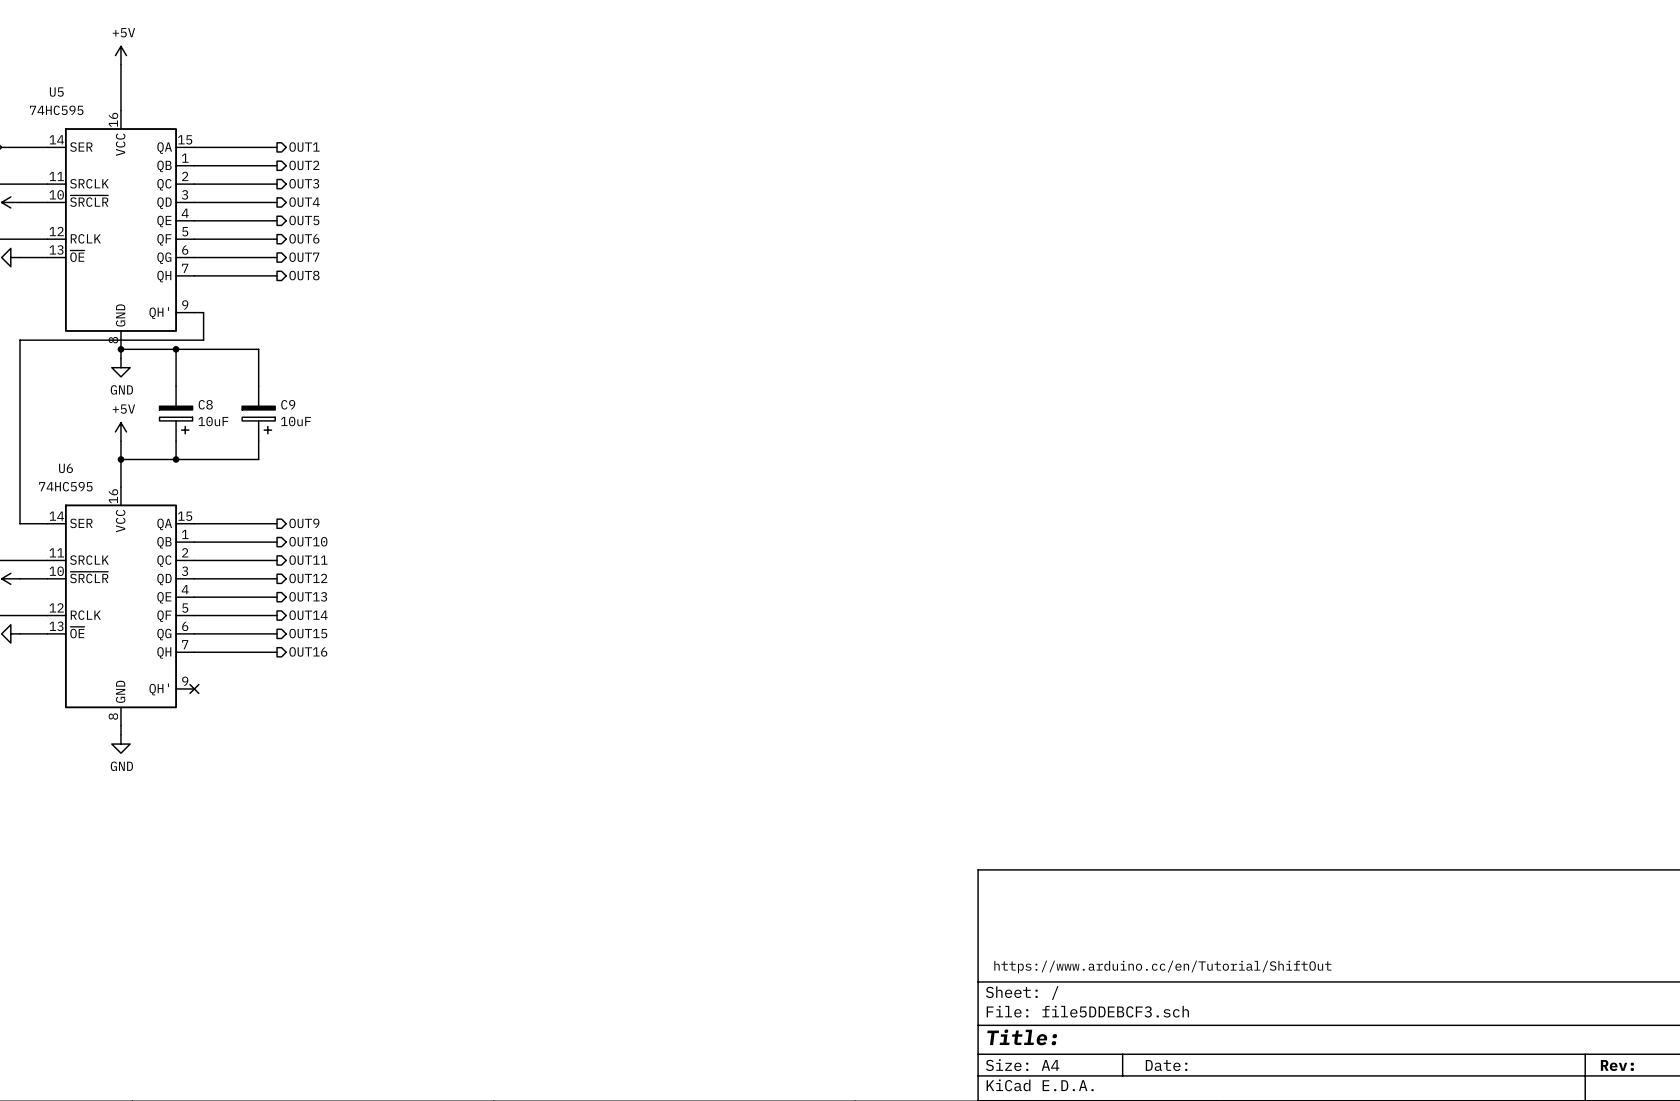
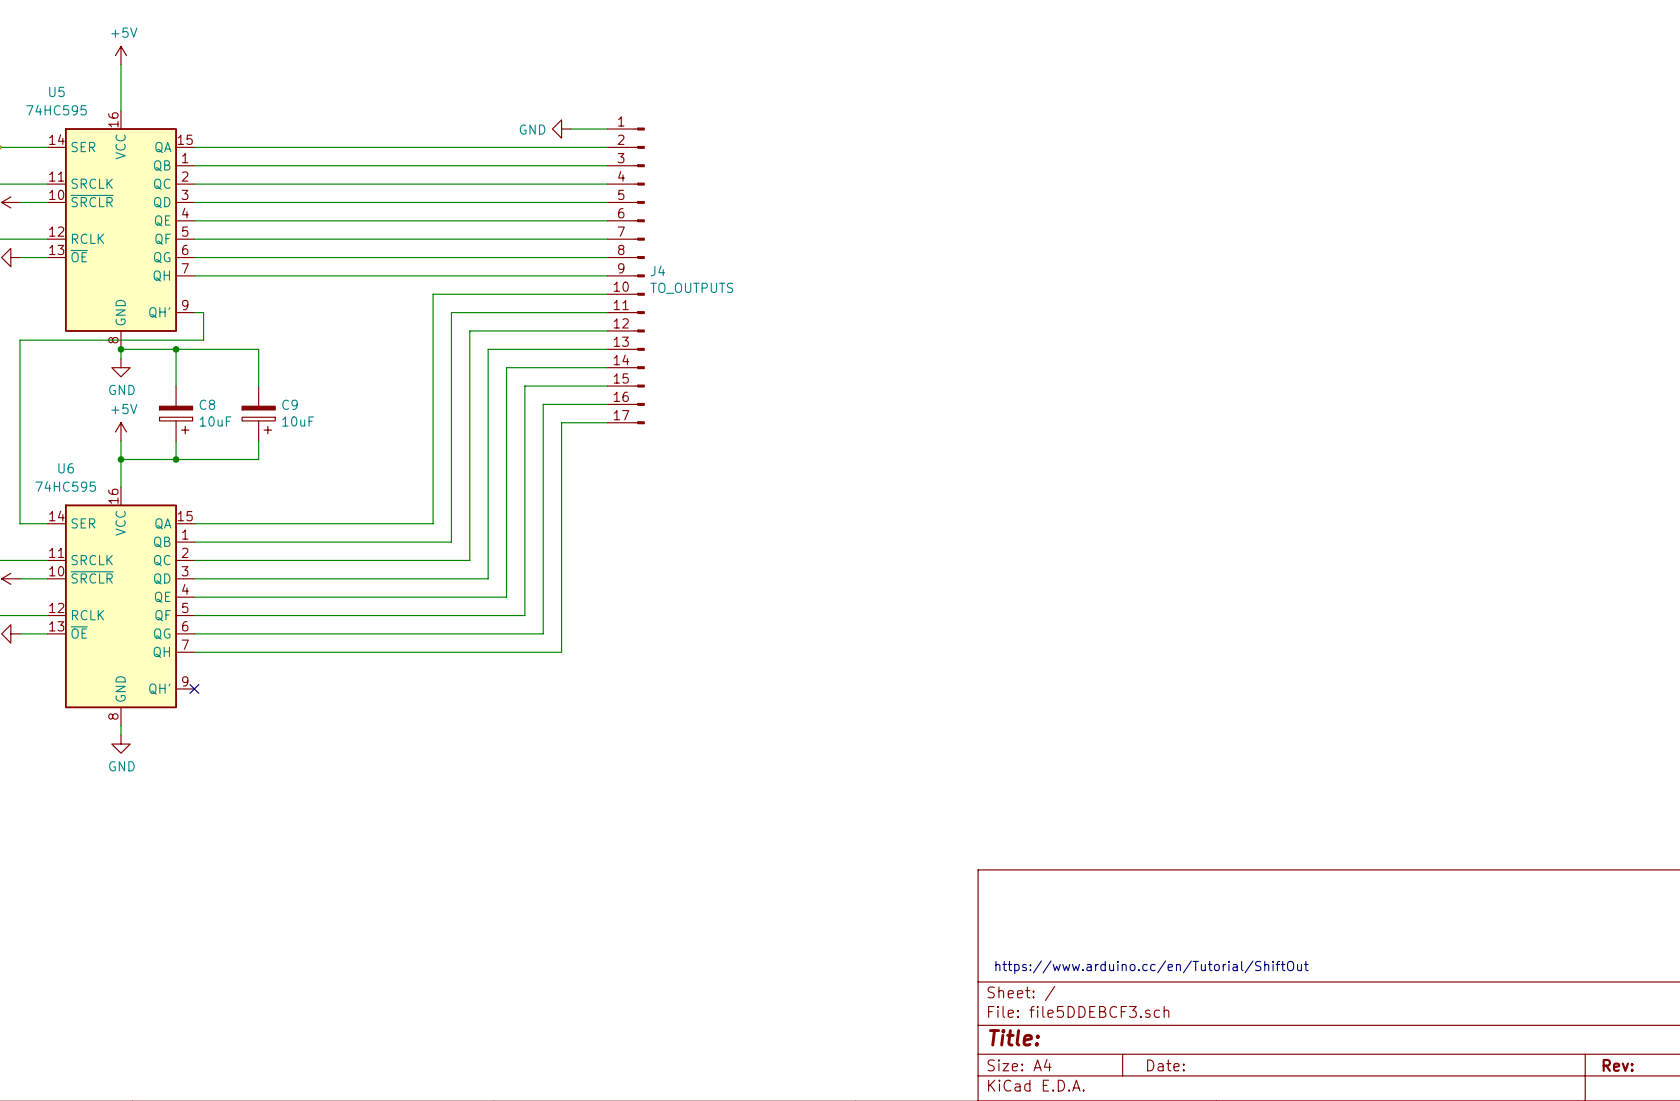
power symbol: none -> GND (561, 129)
wire: none -> (570, 129) (607, 129)
wire: none -> (277, 147) (607, 147)
hierarchical label: OUT1 (304, 147) -> none
wire: none -> (277, 165) (607, 165)
hierarchical label: OUT2 (304, 165) -> none
hierarchical label: OUT3 (304, 183) -> none
wire: none -> (277, 184) (607, 184)
wire: none -> (277, 202) (607, 202)
hierarchical label: OUT4 (304, 202) -> none
wire: none -> (277, 220) (607, 220)
hierarchical label: OUT5 (304, 220) -> none
hierarchical label: OUT6 (304, 238) -> none
wire: none -> (277, 239) (607, 239)
wire: none -> (277, 257) (607, 257)
hierarchical label: OUT7 (304, 257) -> none
wire: none -> (277, 275) (607, 275)
hierarchical label: OUT8 (304, 275) -> none
J4: none -> TO_OUTPUTS (626, 275)
wire: none -> (607, 294) (433, 294) (433, 523) (277, 523)
wire: none -> (607, 312) (451, 312) (451, 542) (277, 542)
wire: none -> (607, 330) (469, 330) (469, 560) (277, 560)
wire: none -> (607, 349) (488, 349) (488, 578) (277, 578)
wire: none -> (607, 367) (506, 367) (506, 597) (277, 597)
wire: none -> (607, 386) (524, 386) (524, 615) (277, 615)
wire: none -> (607, 404) (543, 404) (543, 633) (277, 633)
wire: none -> (607, 422) (561, 422) (561, 652) (277, 652)
hierarchical label: OUT9 (304, 523) -> none
hierarchical label: OUT10 (308, 541) -> none
hierarchical label: OUT11 (308, 560) -> none
hierarchical label: OUT12 (308, 578) -> none
hierarchical label: OUT13 (308, 596) -> none
hierarchical label: OUT14 (308, 615) -> none
hierarchical label: OUT15 (308, 633) -> none
hierarchical label: OUT16 (308, 651) -> none

